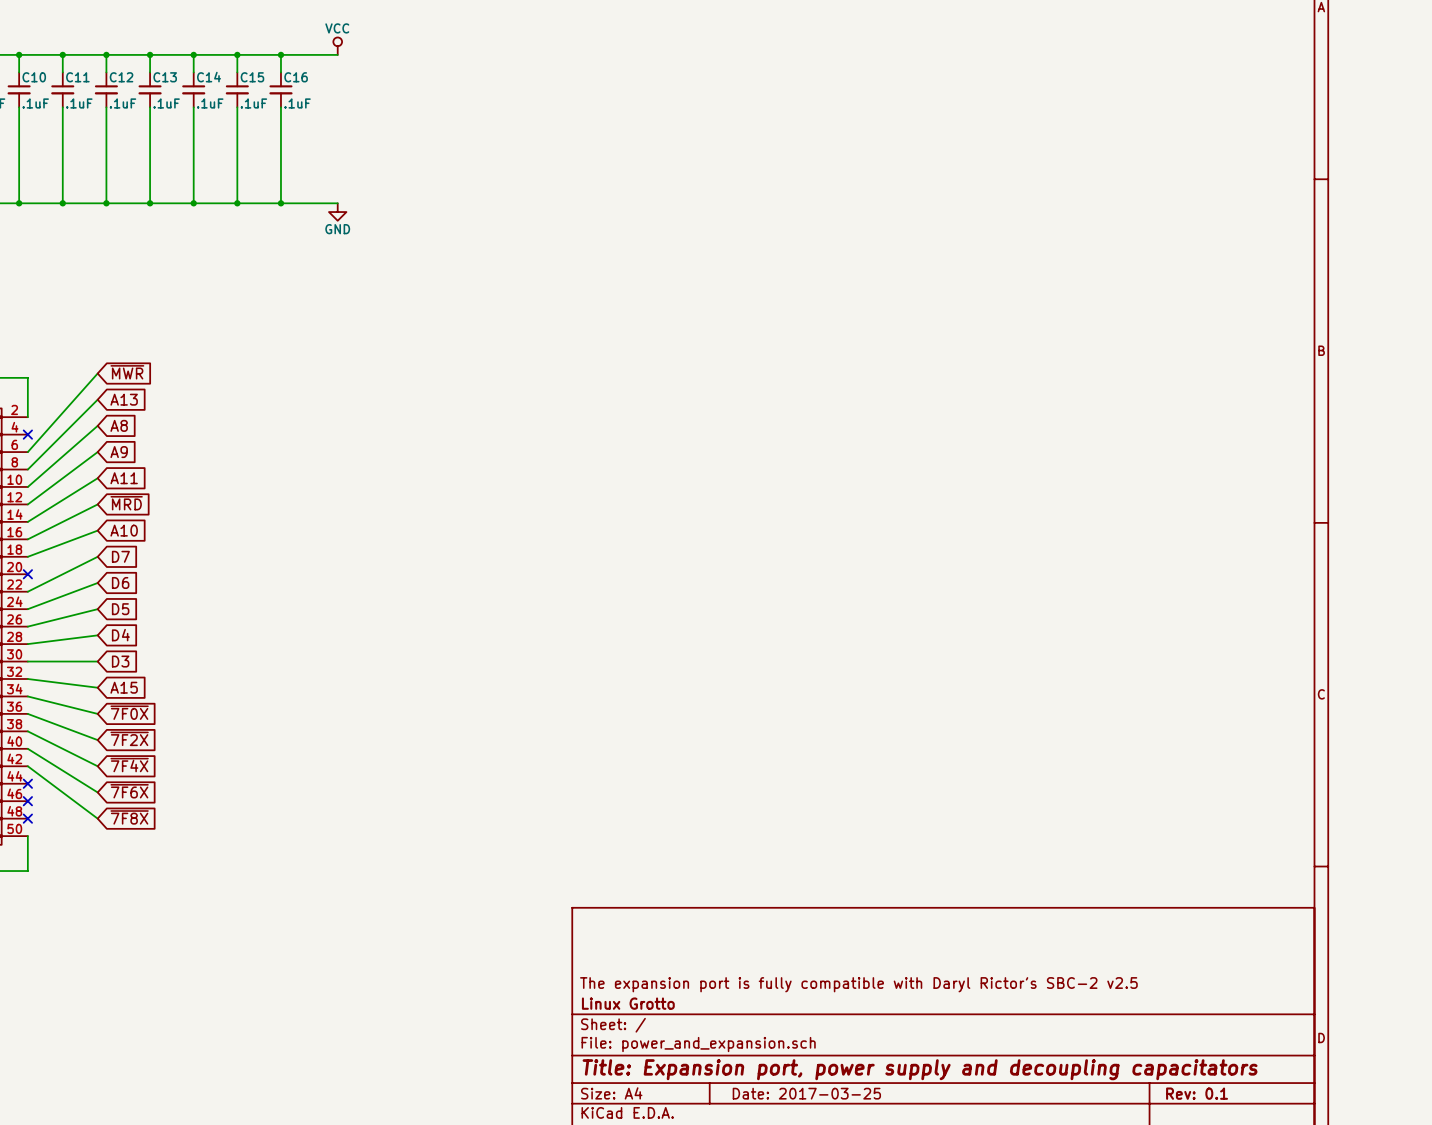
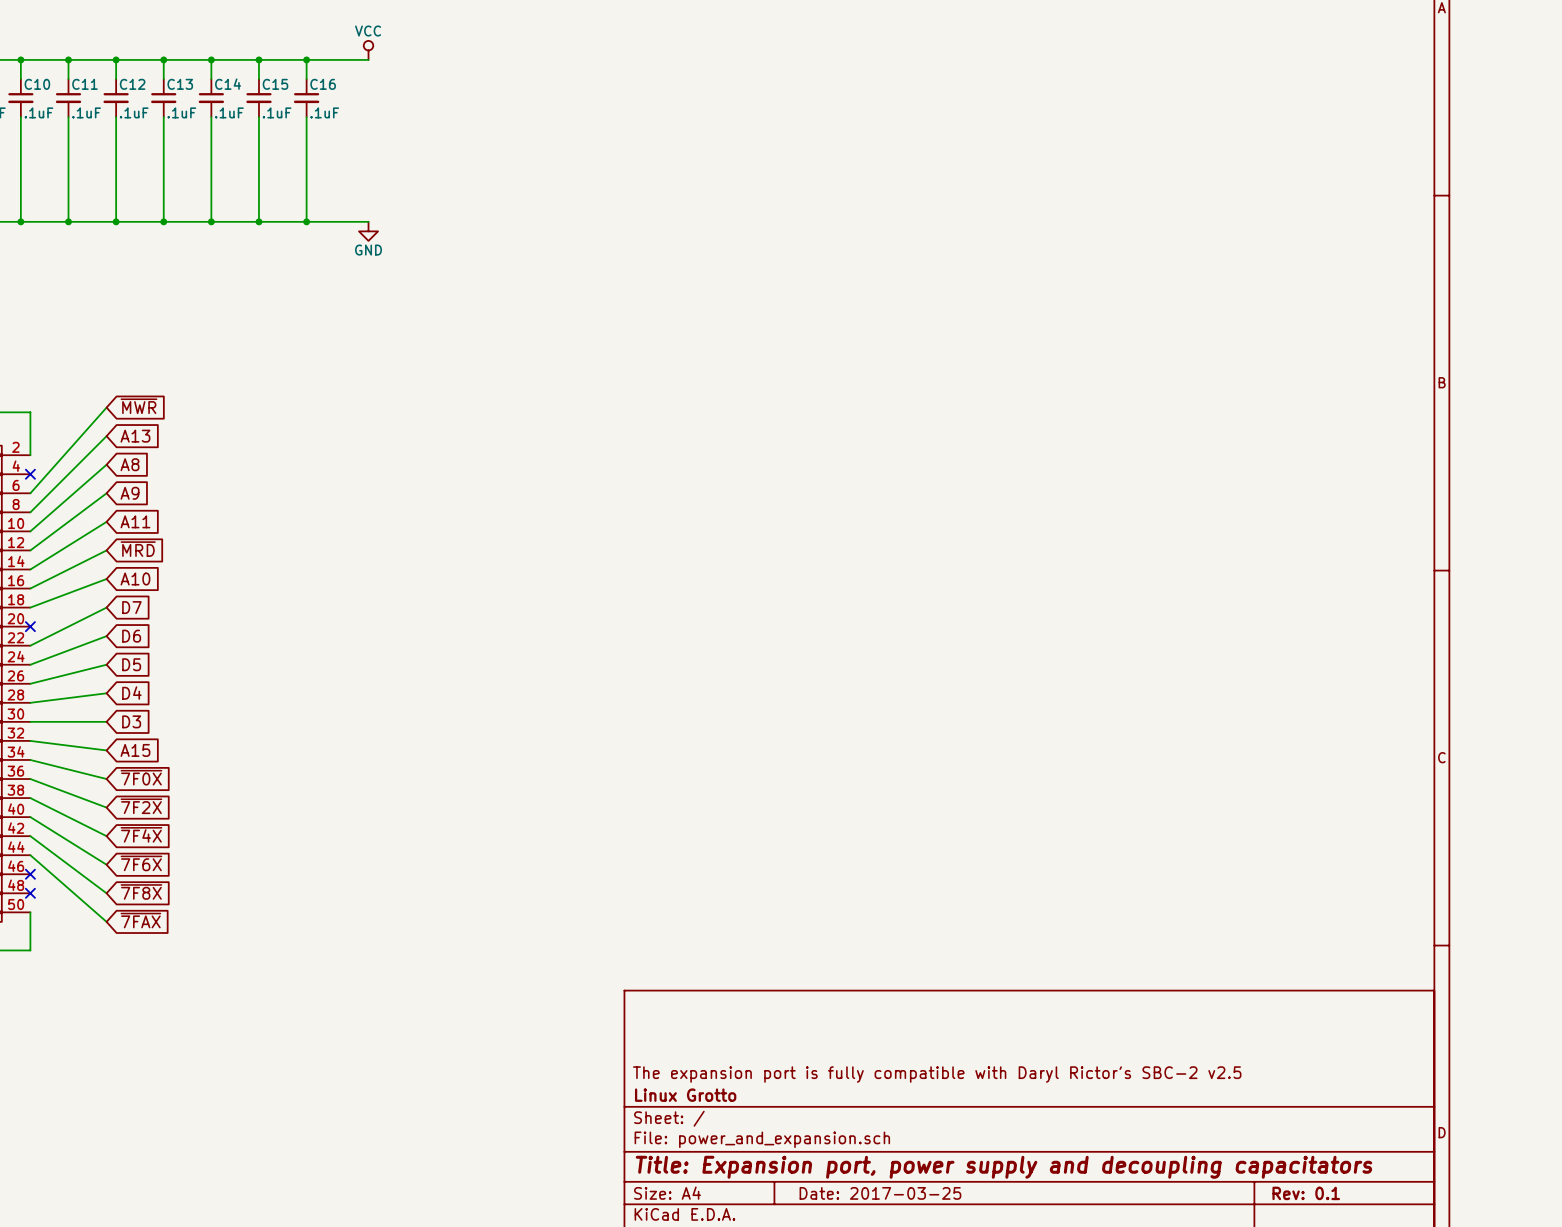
wire: none -> (30, 855) (106, 921)
no-connect mark: (27, 783) -> none
global label: none -> ~{7FAX} (140, 920)

